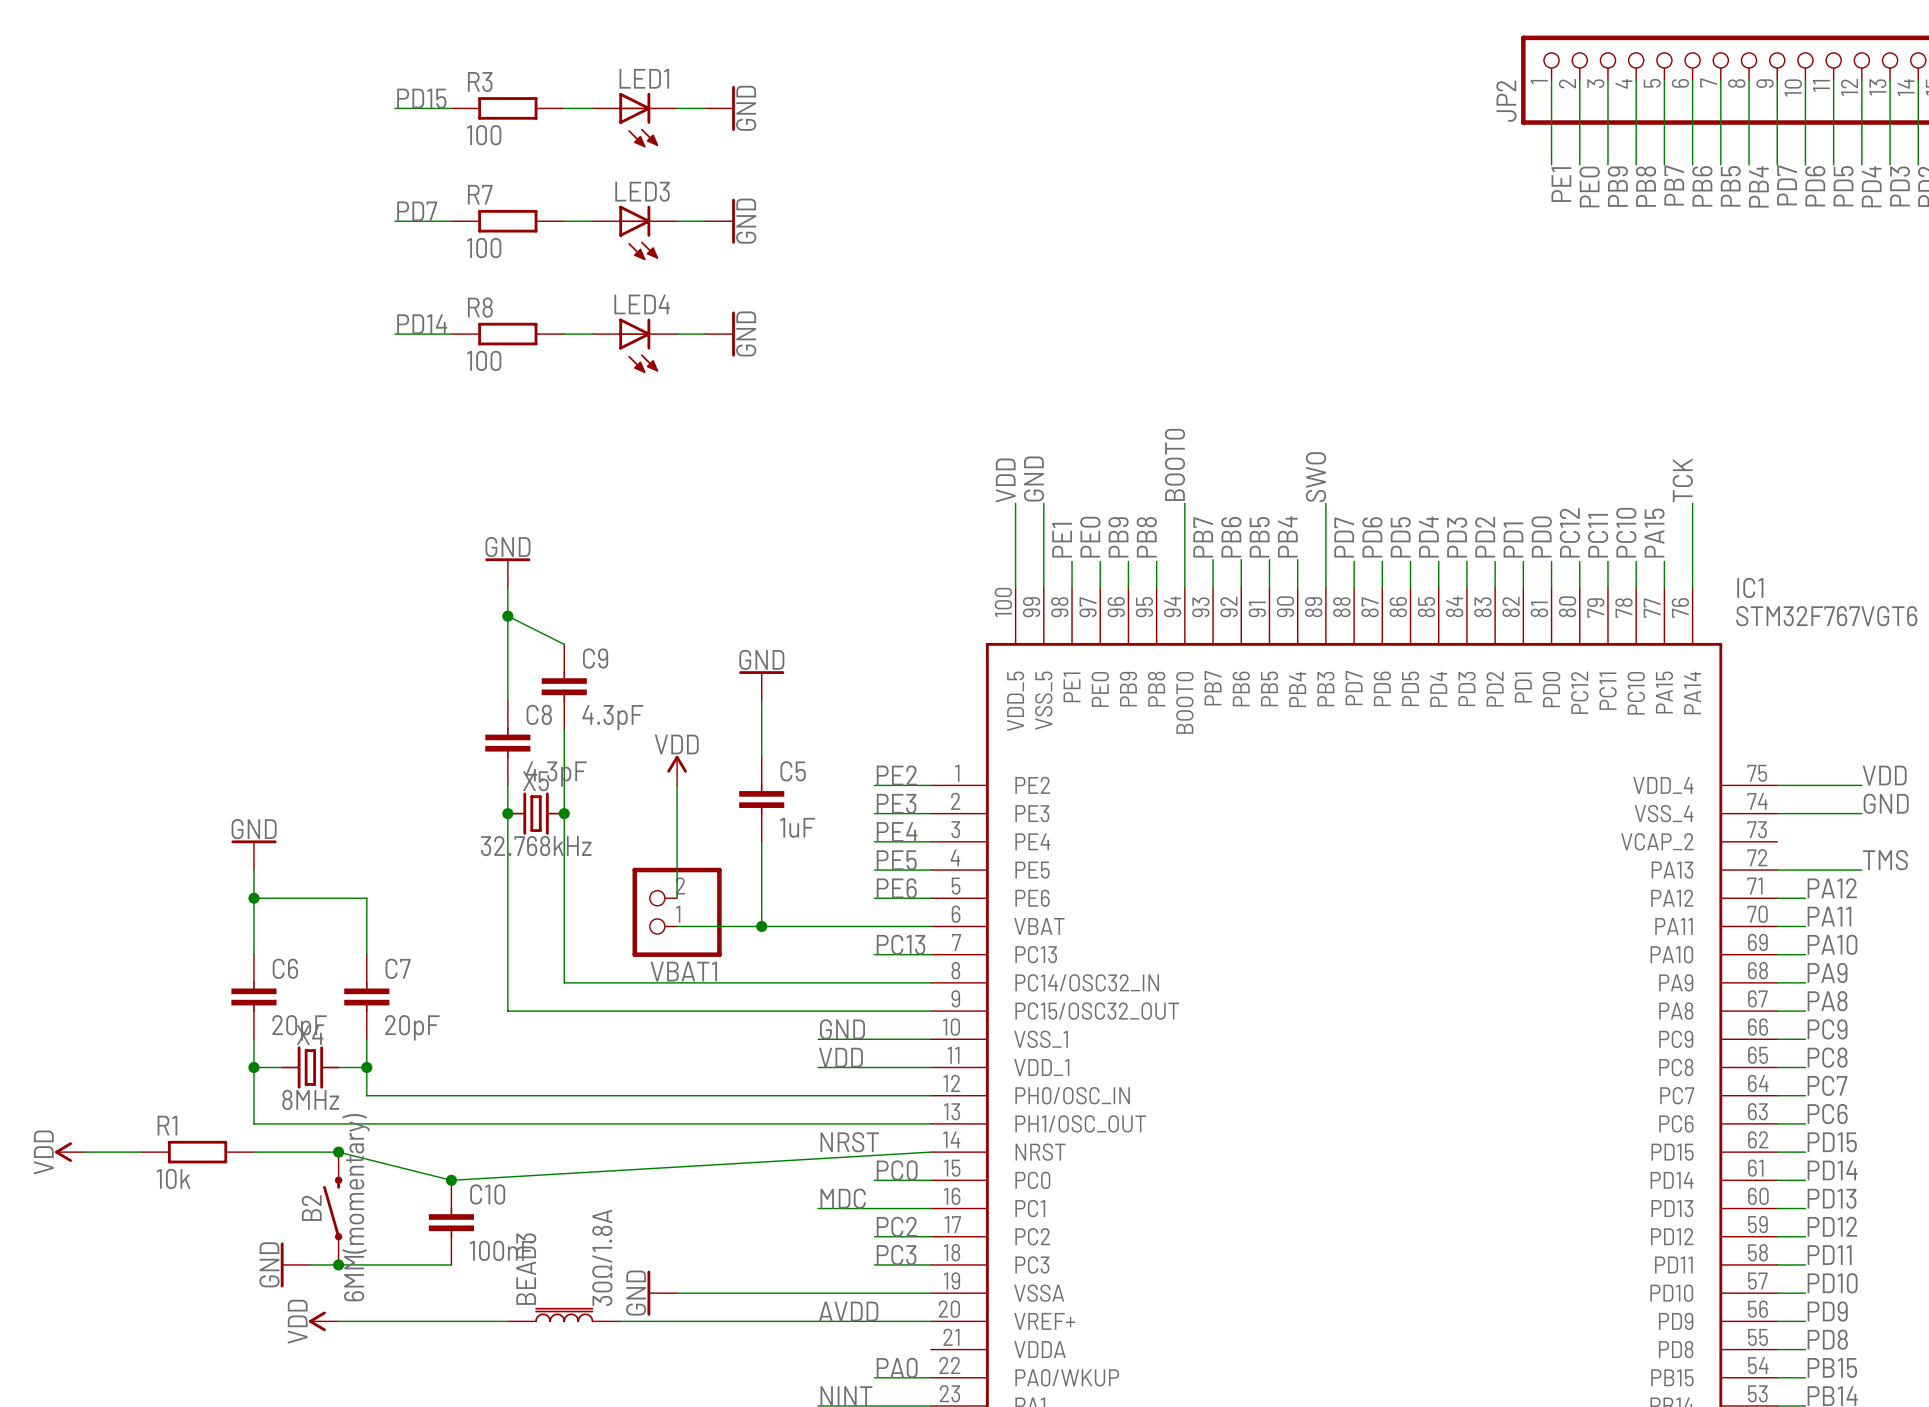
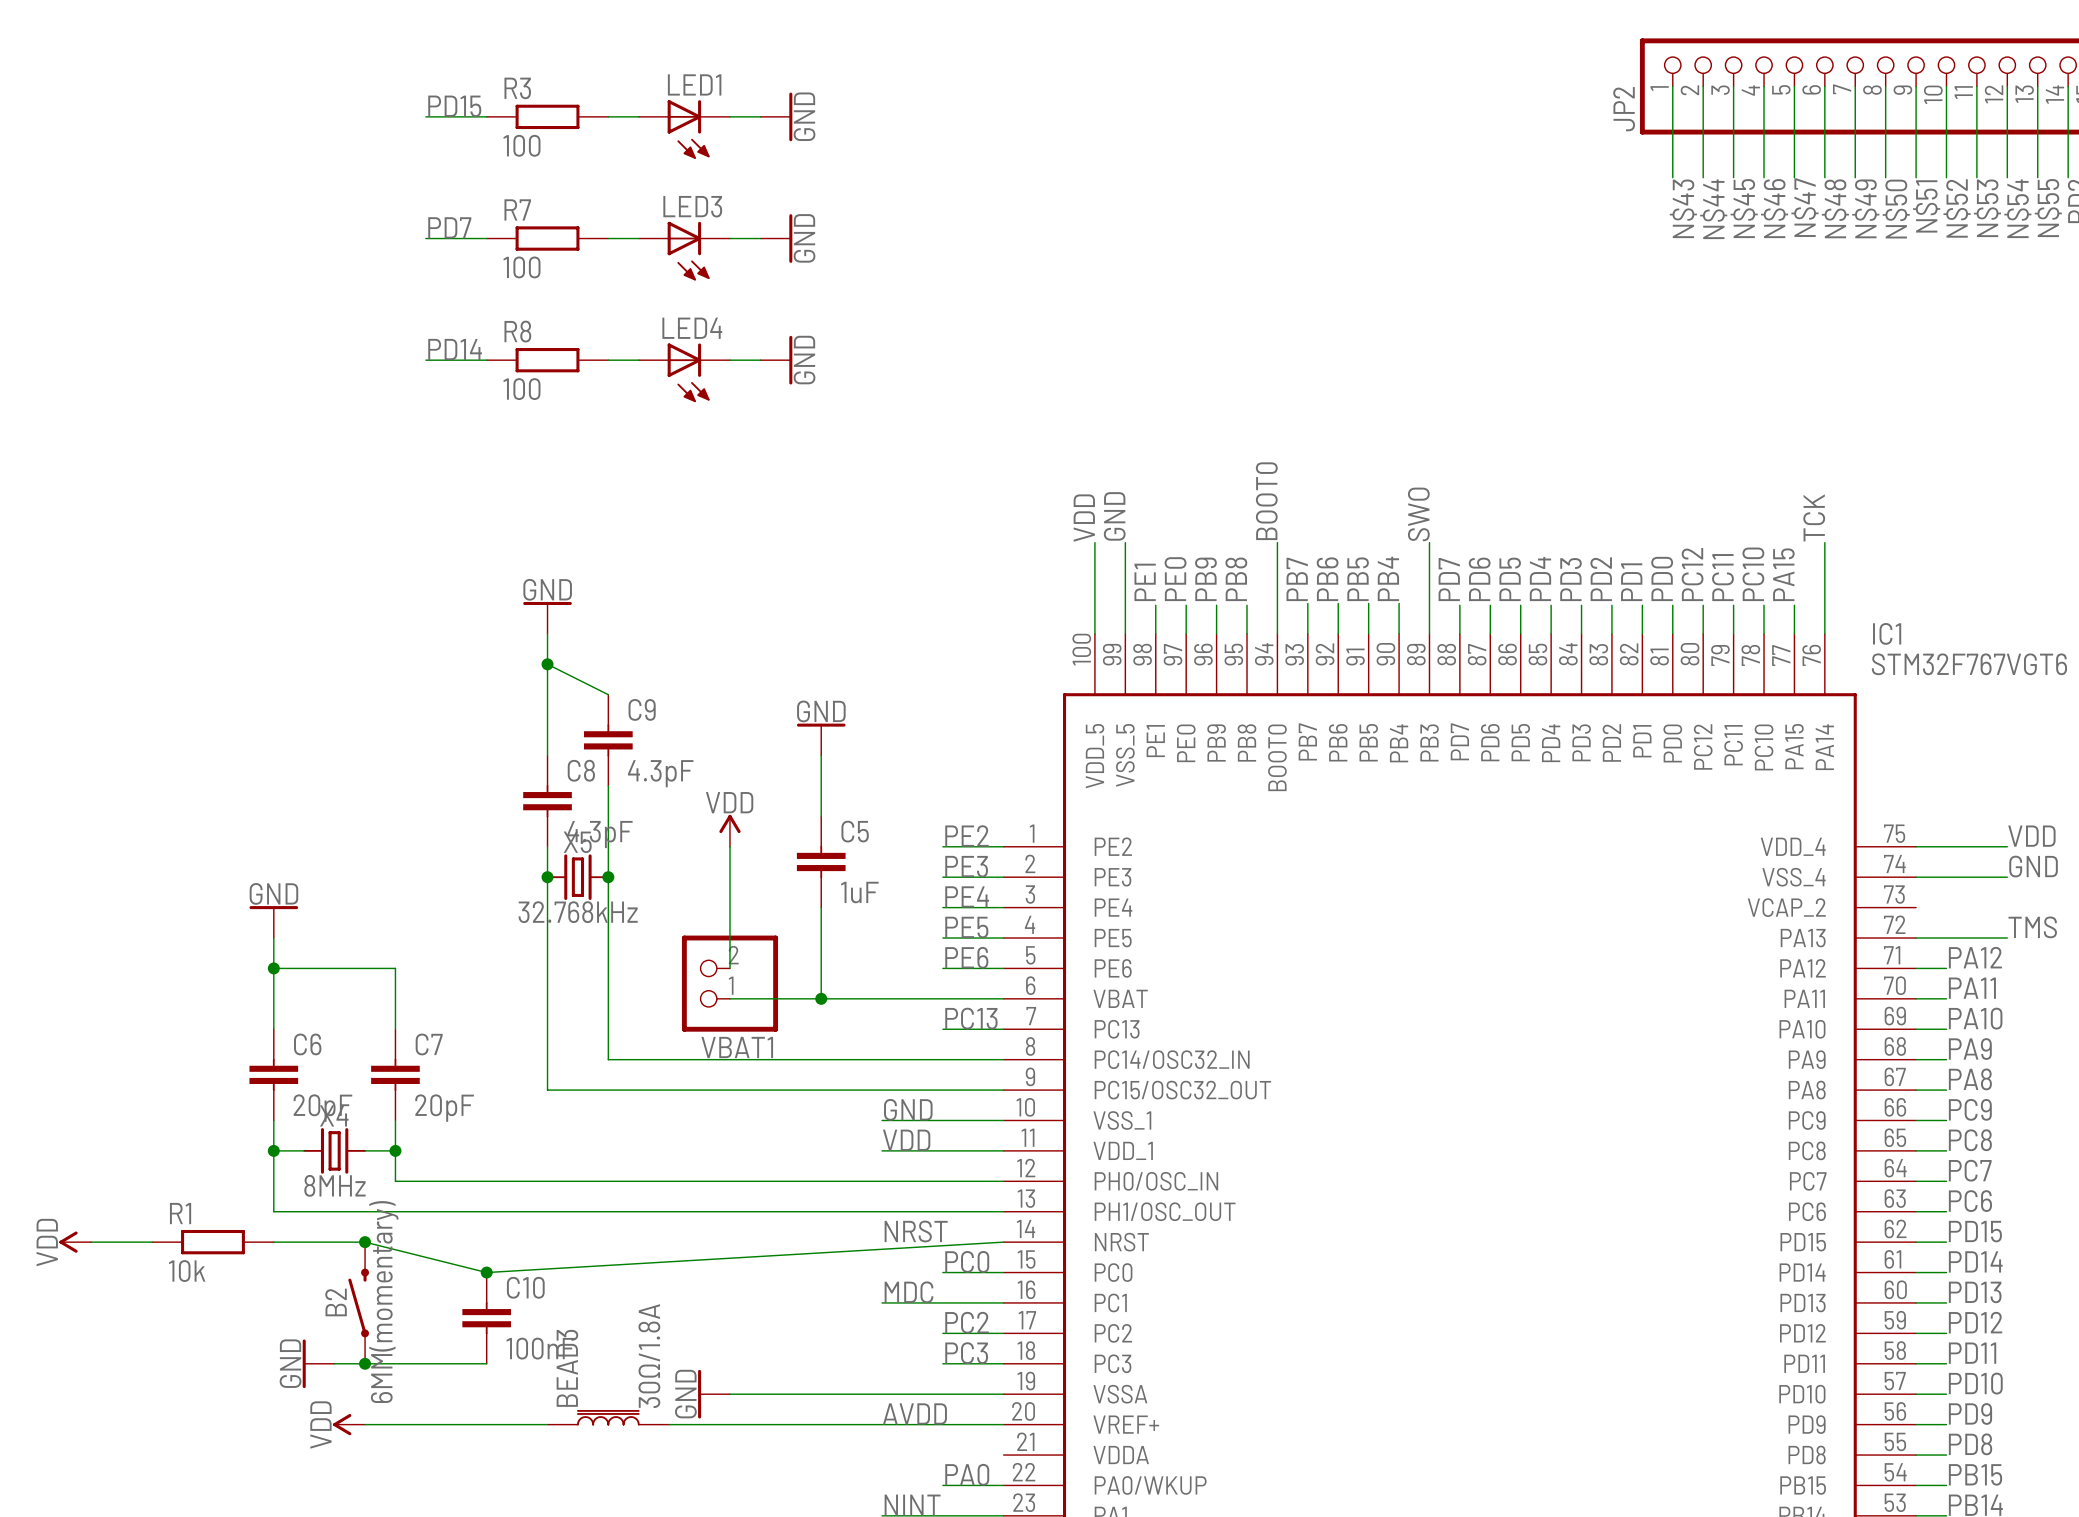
label: PE1 (1561, 184) -> N$43 (1683, 208)
label: PB7 (1674, 185) -> N$47 (1804, 207)
label: PD7 (1787, 185) -> N$51 (1926, 206)
label: PE0 (1589, 186) -> N$44 (1713, 209)
label: PB9 (1617, 186) -> N$45 (1744, 208)
label: PB8 (1646, 186) -> N$46 (1774, 208)
label: PB6 (1702, 186) -> N$48 (1835, 208)
label: PB5 (1730, 186) -> N$49 (1865, 208)
label: PB4 (1758, 186) -> N$50 (1896, 209)
label: PD6 (1815, 186) -> N$52 (1957, 208)
label: PD5 (1843, 186) -> N$53 (1987, 208)
label: PD4 (1871, 186) -> N$54 (2017, 208)
label: PD3 (1900, 186) -> N$55 (2048, 208)

